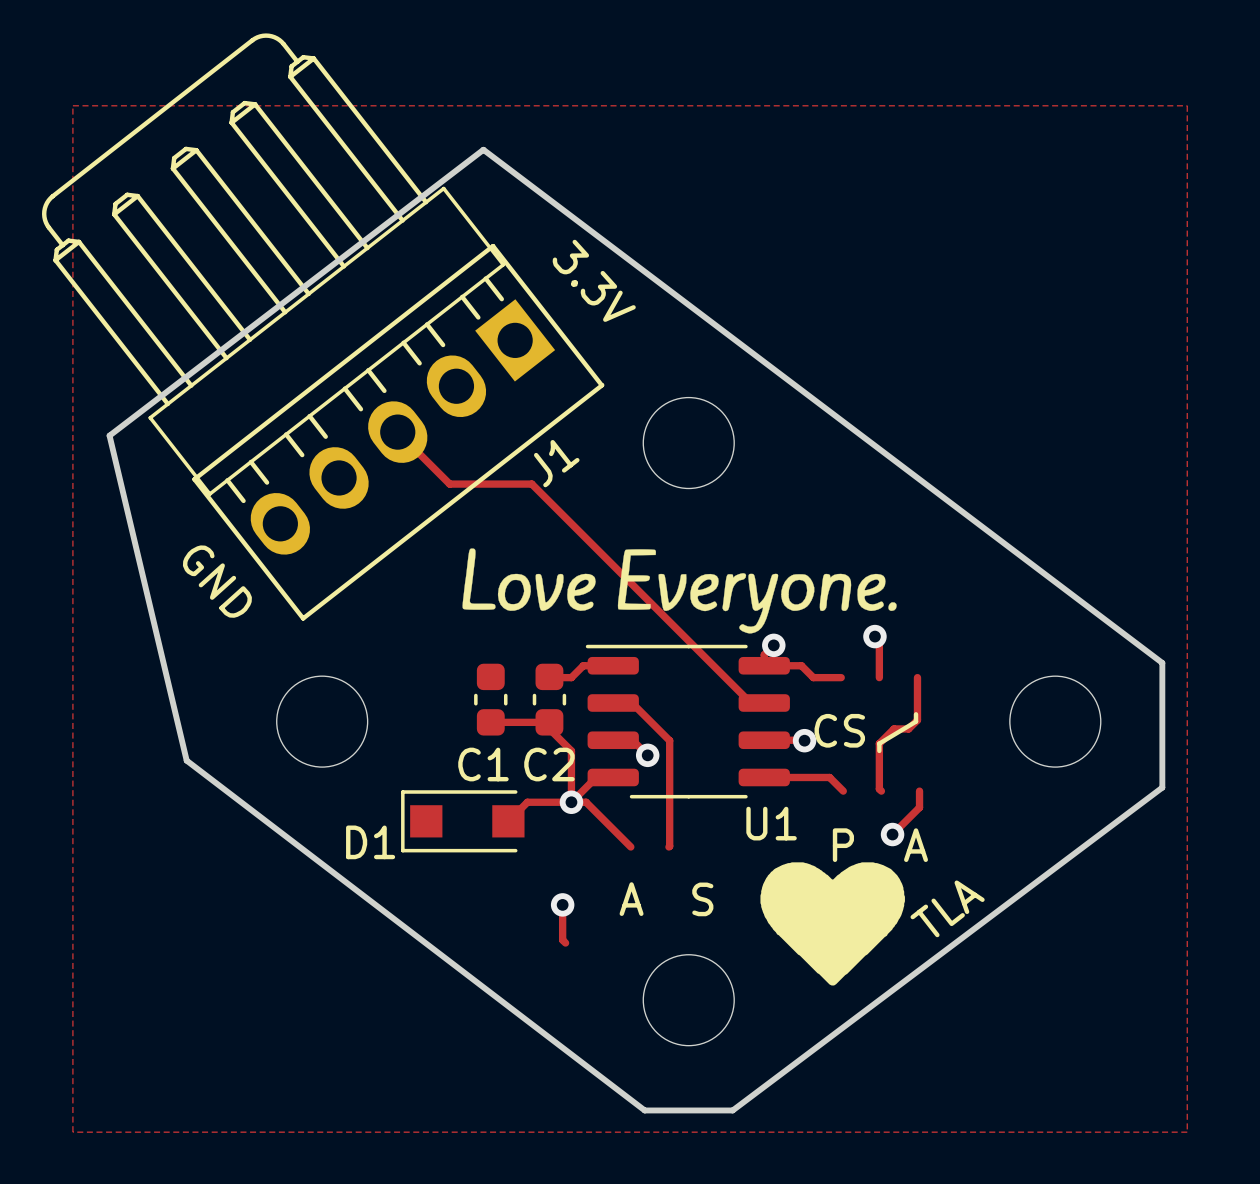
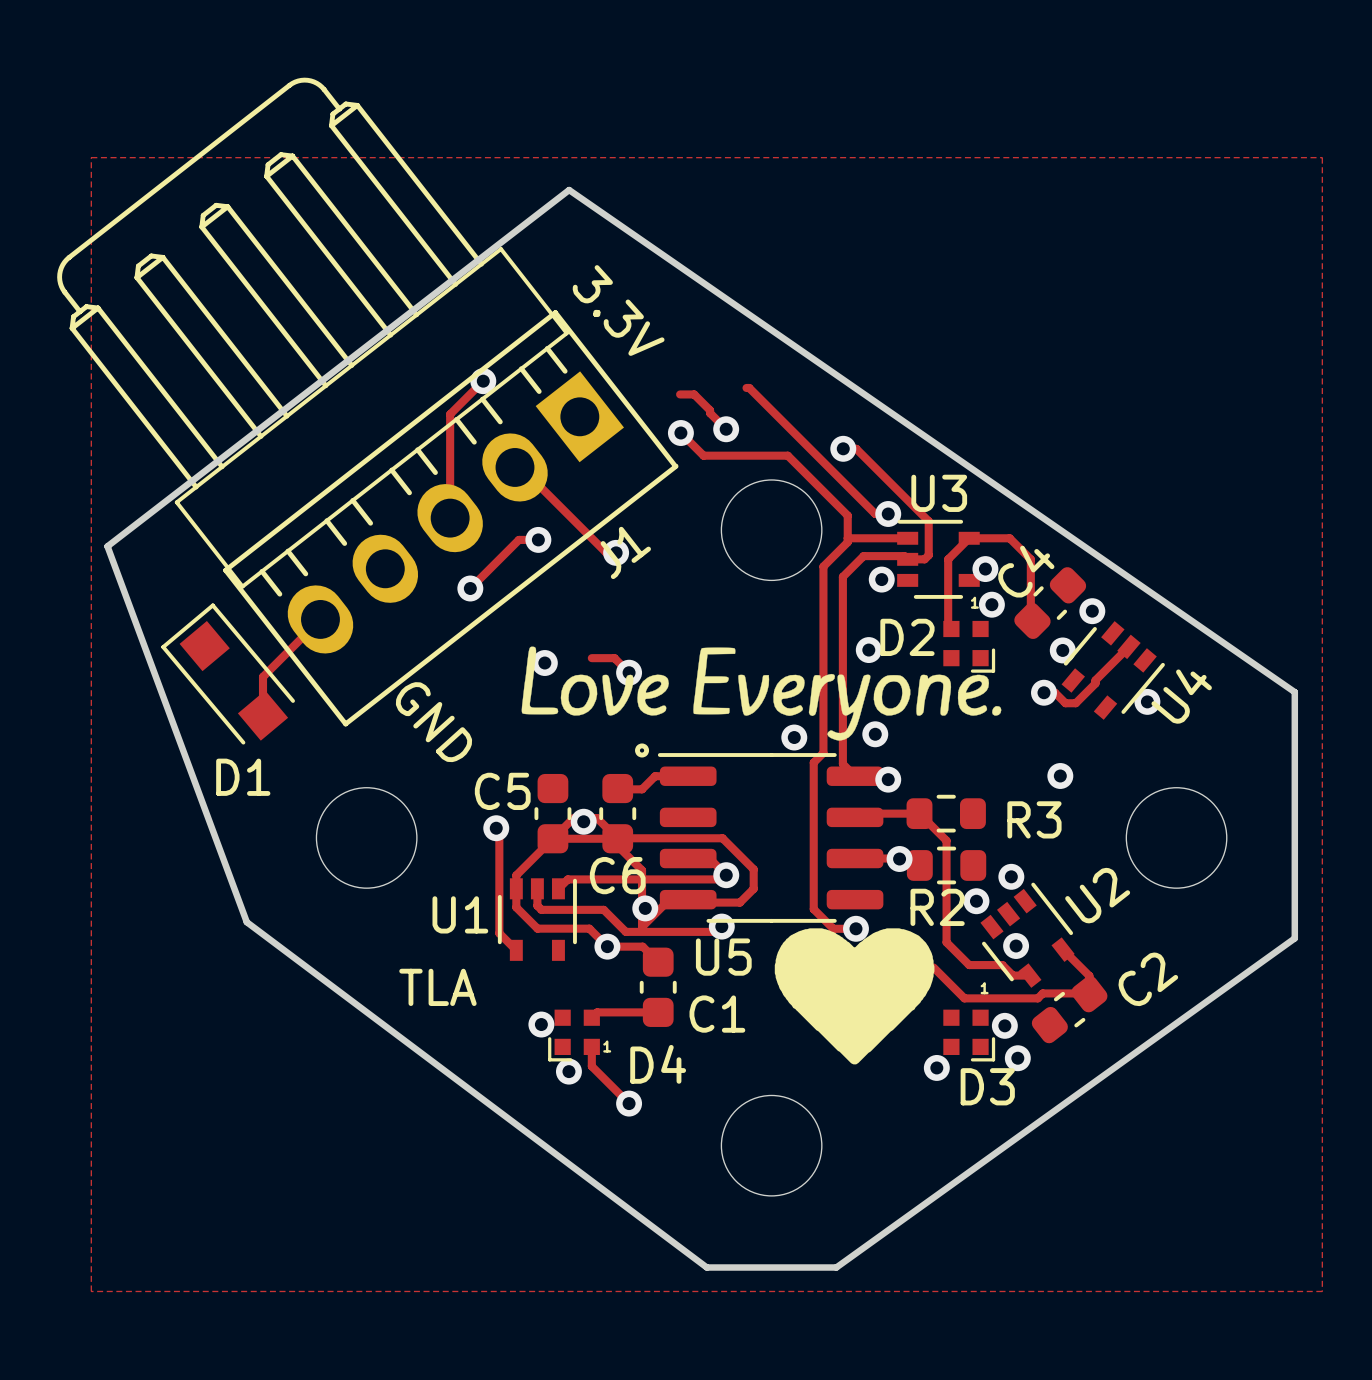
text position: 3.3V (594, 280) -> 3.3V (618, 310)
track: none -> (483, 381) (450, 414) (450, 518)
via: none -> (483, 381)
track: none -> (746, 387) (749, 387) (875, 513) (888, 513)
track: none -> (680, 394) (694, 394) (726, 429)
via: none -> (726, 429)
track: none -> (680, 433) (703, 455) (787, 455) (847, 515) (847, 542) (823, 566) (823, 752) (813, 762) (813, 909) (833, 928) (855, 928)
via: none -> (680, 433)
track: none -> (843, 448) (856, 448) (928, 521) (928, 555) (924, 559) (907, 559) (904, 556) (863, 556) (842, 576) (842, 764) (858, 779) (888, 779)
via: none -> (843, 448)
track: none -> (514, 467) (521, 467) (606, 552) (616, 552)
via: none -> (888, 513)
track: (397, 445) (397, 432) (449, 484) (531, 484) (750, 702) (764, 702) -> (1029, 975) (1012, 975) (1002, 965) (969, 965) (946, 942) (946, 840) (919, 813) (858, 813) (855, 817)
track: none -> (847, 538) (907, 538)
track: none -> (538, 539) (518, 539) (470, 588)
via: none -> (538, 539)
via: none -> (616, 552)
U3: none -> (938, 559)
via: none -> (985, 569)
via: none -> (881, 579)
via: none -> (470, 588)
C4: none -> (1050, 603)
via: none -> (991, 604)
via: none -> (1092, 611)
track: none -> (320, 619) (263, 676) (263, 715)
track: none -> (1030, 622) (1030, 559) (1009, 538) (969, 538) (948, 559) (948, 625) (951, 628)
D2: none -> (969, 646)
track: none -> (1128, 646) (1075, 703) (1065, 703) (1054, 692) (1043, 692)
via: none -> (868, 650)
via: none -> (1062, 650)
track: none -> (591, 658) (614, 658) (629, 672)
via: none -> (544, 663)
U4: none -> (1113, 670)
via: none -> (629, 672)
text position: GND (217, 581) -> GND (433, 722)
via: none -> (1043, 692)
via: none -> (1147, 701)
via: none -> (875, 734)
via: none -> (794, 737)
drawing: none -> [635, 743, 650, 758]
track: (874, 636) (879, 640) (879, 677) -> none
via: (874, 636) -> none
track: (773, 645) (764, 654) (764, 665) (801, 665) (813, 677) (841, 677) -> none
via: (773, 645) -> none
board edge: (1162, 662) (483, 149) (109, 435) (186, 760) (644, 1110) -> (1294, 773) (1294, 692) (569, 190) (107, 546) (246, 922) (706, 1267) (723, 1267)
via: none -> (1060, 775)
via: none -> (888, 779)
track: (917, 677) (917, 720) (908, 728) (894, 728) (879, 743) (879, 789) (881, 791) -> none
R3: none -> (946, 813)
track: (613, 702) (632, 702) (669, 740) (668, 846) -> none
via: none -> (583, 821)
track: none -> (496, 828) (499, 831) (499, 933) (516, 950)
via: none -> (496, 828)
line: (916, 714) (916, 721) (879, 743) (879, 750) -> none
text: CS (839, 730) -> none
R2: none -> (946, 865)
via: none -> (1011, 876)
track: none -> (729, 879) (567, 879) (558, 888)
C1 name: C1 (483, 764) -> C5 (502, 791)
C2 name: C2 (549, 764) -> C6 (617, 875)
track: none -> (537, 888) (537, 905) (541, 909) (603, 909) (625, 931) (716, 931) (721, 926)
track: none -> (688, 899) (691, 902) (739, 902) (753, 888) (753, 869) (722, 838) (617, 838) (597, 818) (573, 818) (516, 875) (516, 907) (537, 928) (589, 928) (607, 946) (642, 946) (658, 962)
track: (764, 777) (829, 777) (843, 791) -> none
via: none -> (976, 901)
board edge: (1162, 787) (732, 1110) -> (1294, 910) (1294, 938) (836, 1267) (820, 1267)
track: (919, 791) (919, 807) (892, 834) -> none
U1: none -> (537, 919)
via: none -> (721, 926)
via position: (571, 802) -> (645, 908)
via: none -> (855, 928)
U2: none -> (1027, 935)
via: none -> (607, 946)
D1 rotation: 0° (462, 821) -> 50° clockwise (228, 674)
D1 position: (462, 821) -> (228, 674)
track: (508, 821) (527, 802) (586, 802) (630, 846) -> none
track: none -> (1063, 949) (1089, 976) (1089, 994)
U1 name: U1 (771, 823) -> U5 (723, 957)
via position: (892, 834) -> (1016, 945)
track: none -> (933, 967) (964, 998) (1037, 998) (1042, 993) (1088, 993) (1092, 997)
D1 name position: D1 (370, 842) -> D1 (243, 777)
text: P (843, 845) -> none
text: A (916, 845) -> none
C1: none -> (658, 987)
C2: none -> (1069, 1009)
track: none -> (651, 1012) (597, 1012) (591, 1017)
via: none -> (541, 1024)
via: none -> (1004, 1025)
text: A (631, 899) -> none
text: S (702, 899) -> none
D4: none -> (574, 1035)
D3: none -> (969, 1035)
track: (562, 904) (562, 940) (565, 943) -> none
via: (562, 904) -> none
text rotation: 0° (947, 908) -> 38° clockwise (437, 987)
text position: TLA (947, 908) -> TLA (437, 987)
track: none -> (591, 1046) (591, 1066) (629, 1103)
via: none -> (1017, 1058)
drawing position: (832, 923) -> (854, 996)
via: none -> (936, 1067)
via: none -> (568, 1071)
via: none -> (629, 1103)

